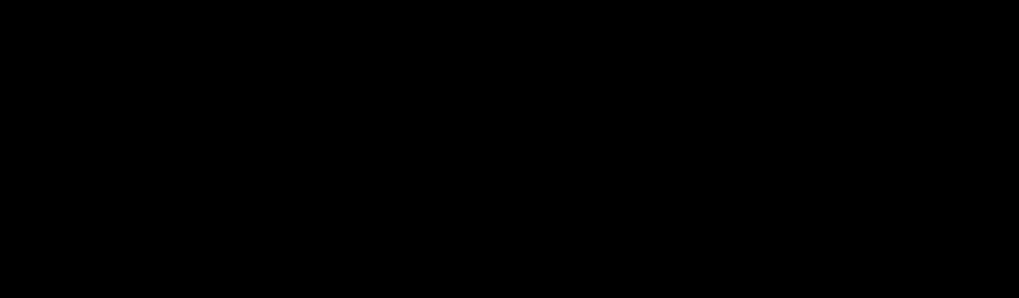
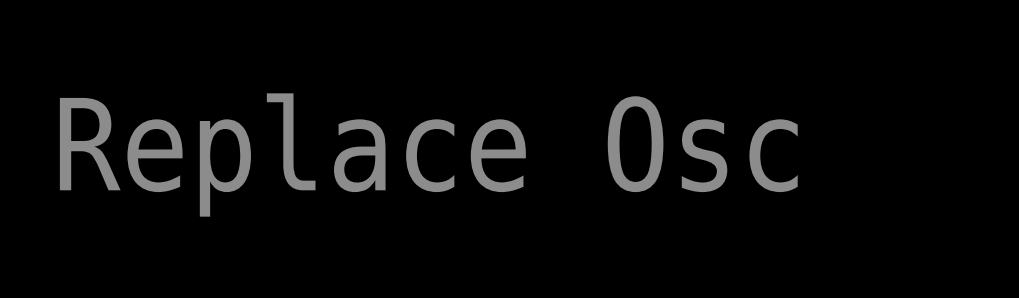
text: none -> Replace Osc (428, 154)

